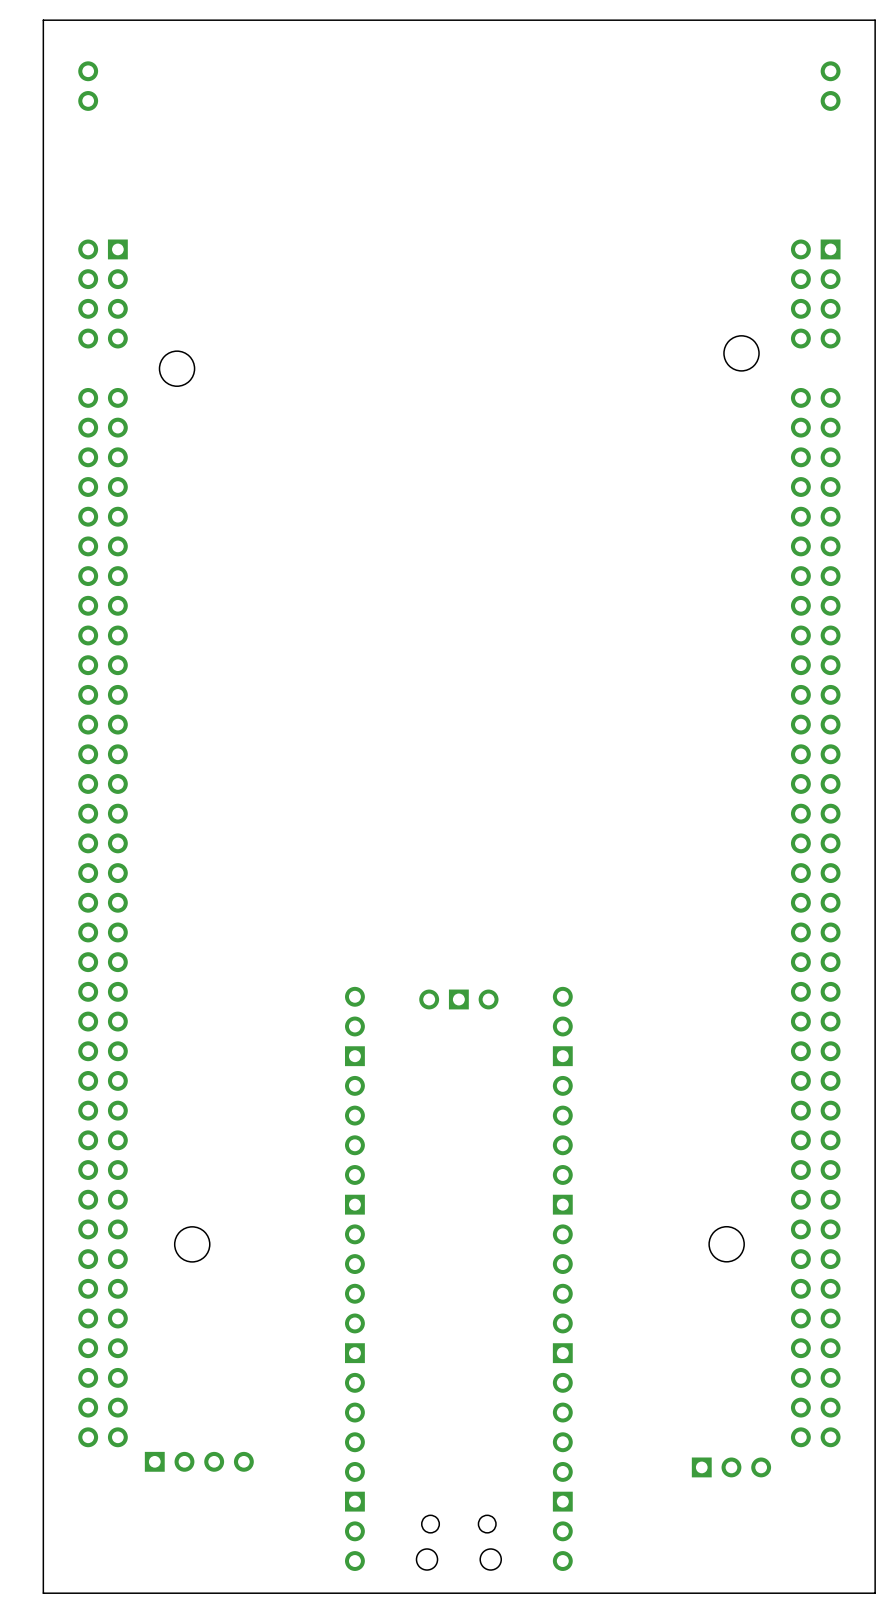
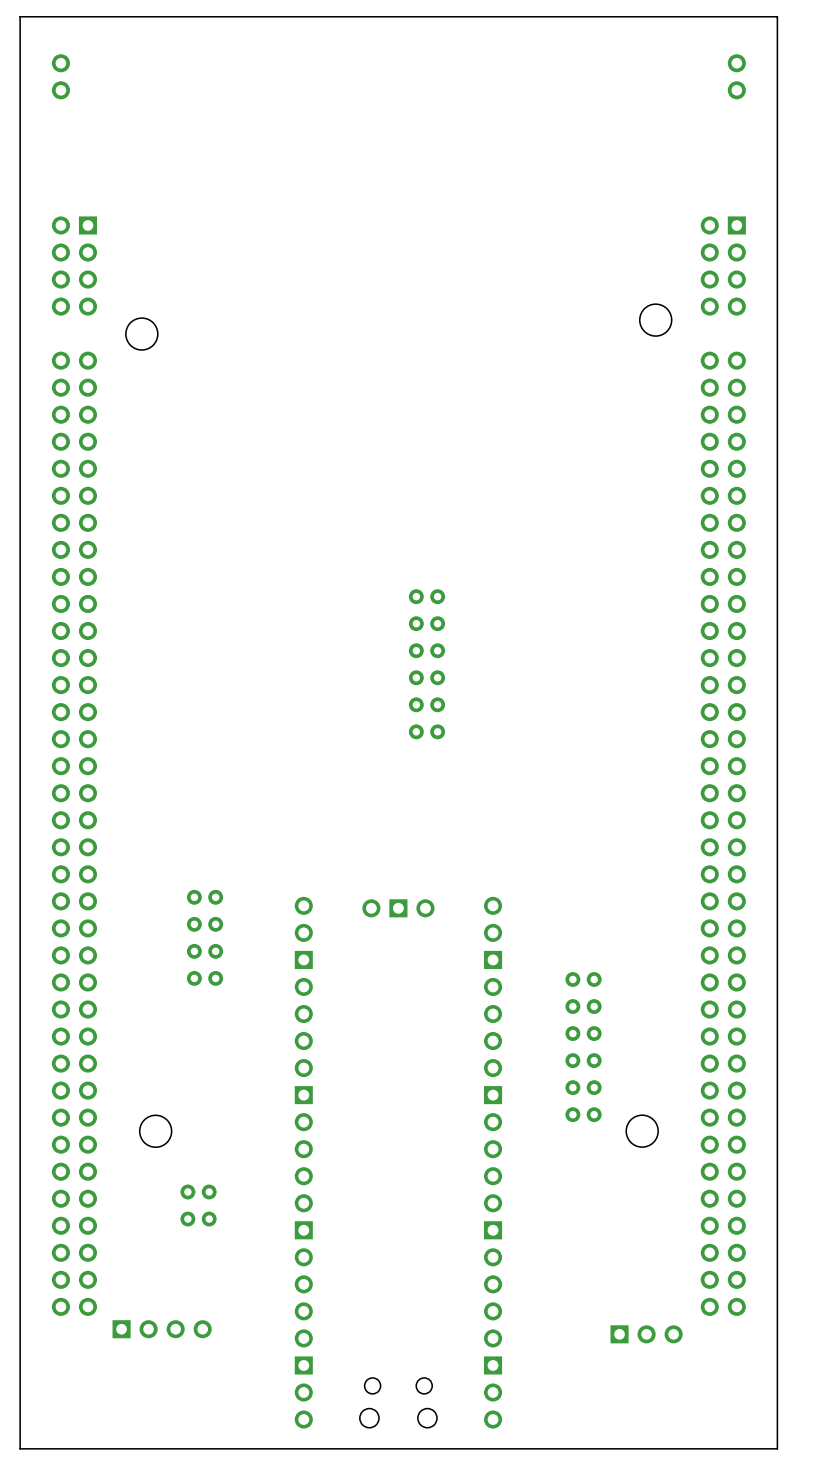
part: none -> (427, 596)
part: none -> (427, 623)
part: none -> (427, 650)
part: none -> (427, 677)
part: none -> (427, 704)
part: none -> (427, 731)
part: none -> (205, 897)
part: none -> (205, 924)
part: none -> (205, 951)
part: none -> (205, 978)
part: none -> (583, 979)
part: none -> (583, 1006)
part: none -> (583, 1033)
part: none -> (583, 1060)
part: none -> (583, 1087)
part: none -> (583, 1114)
part: none -> (198, 1191)
part: none -> (198, 1219)

